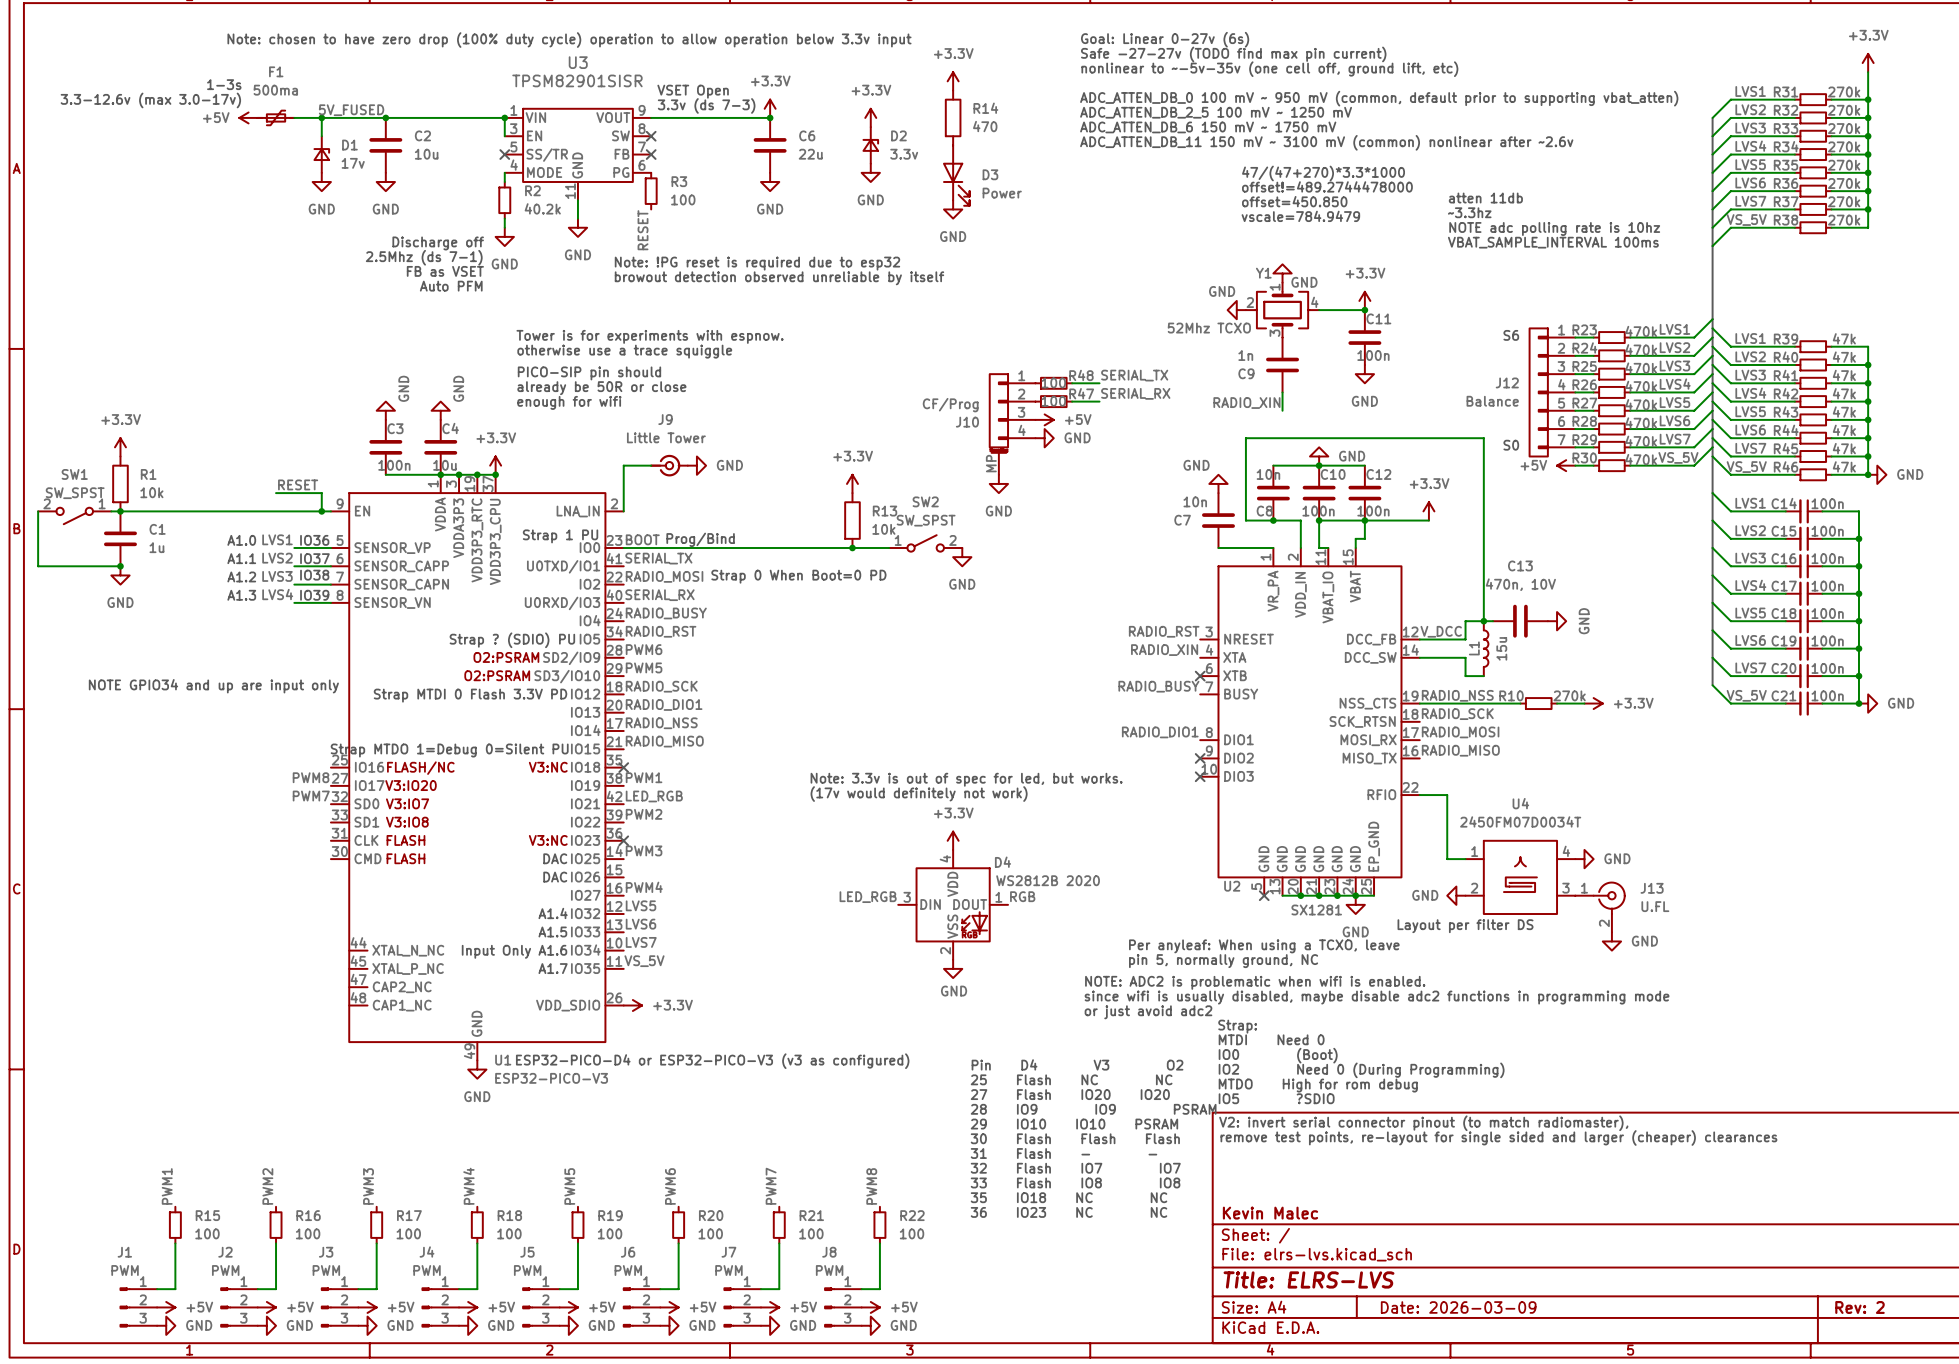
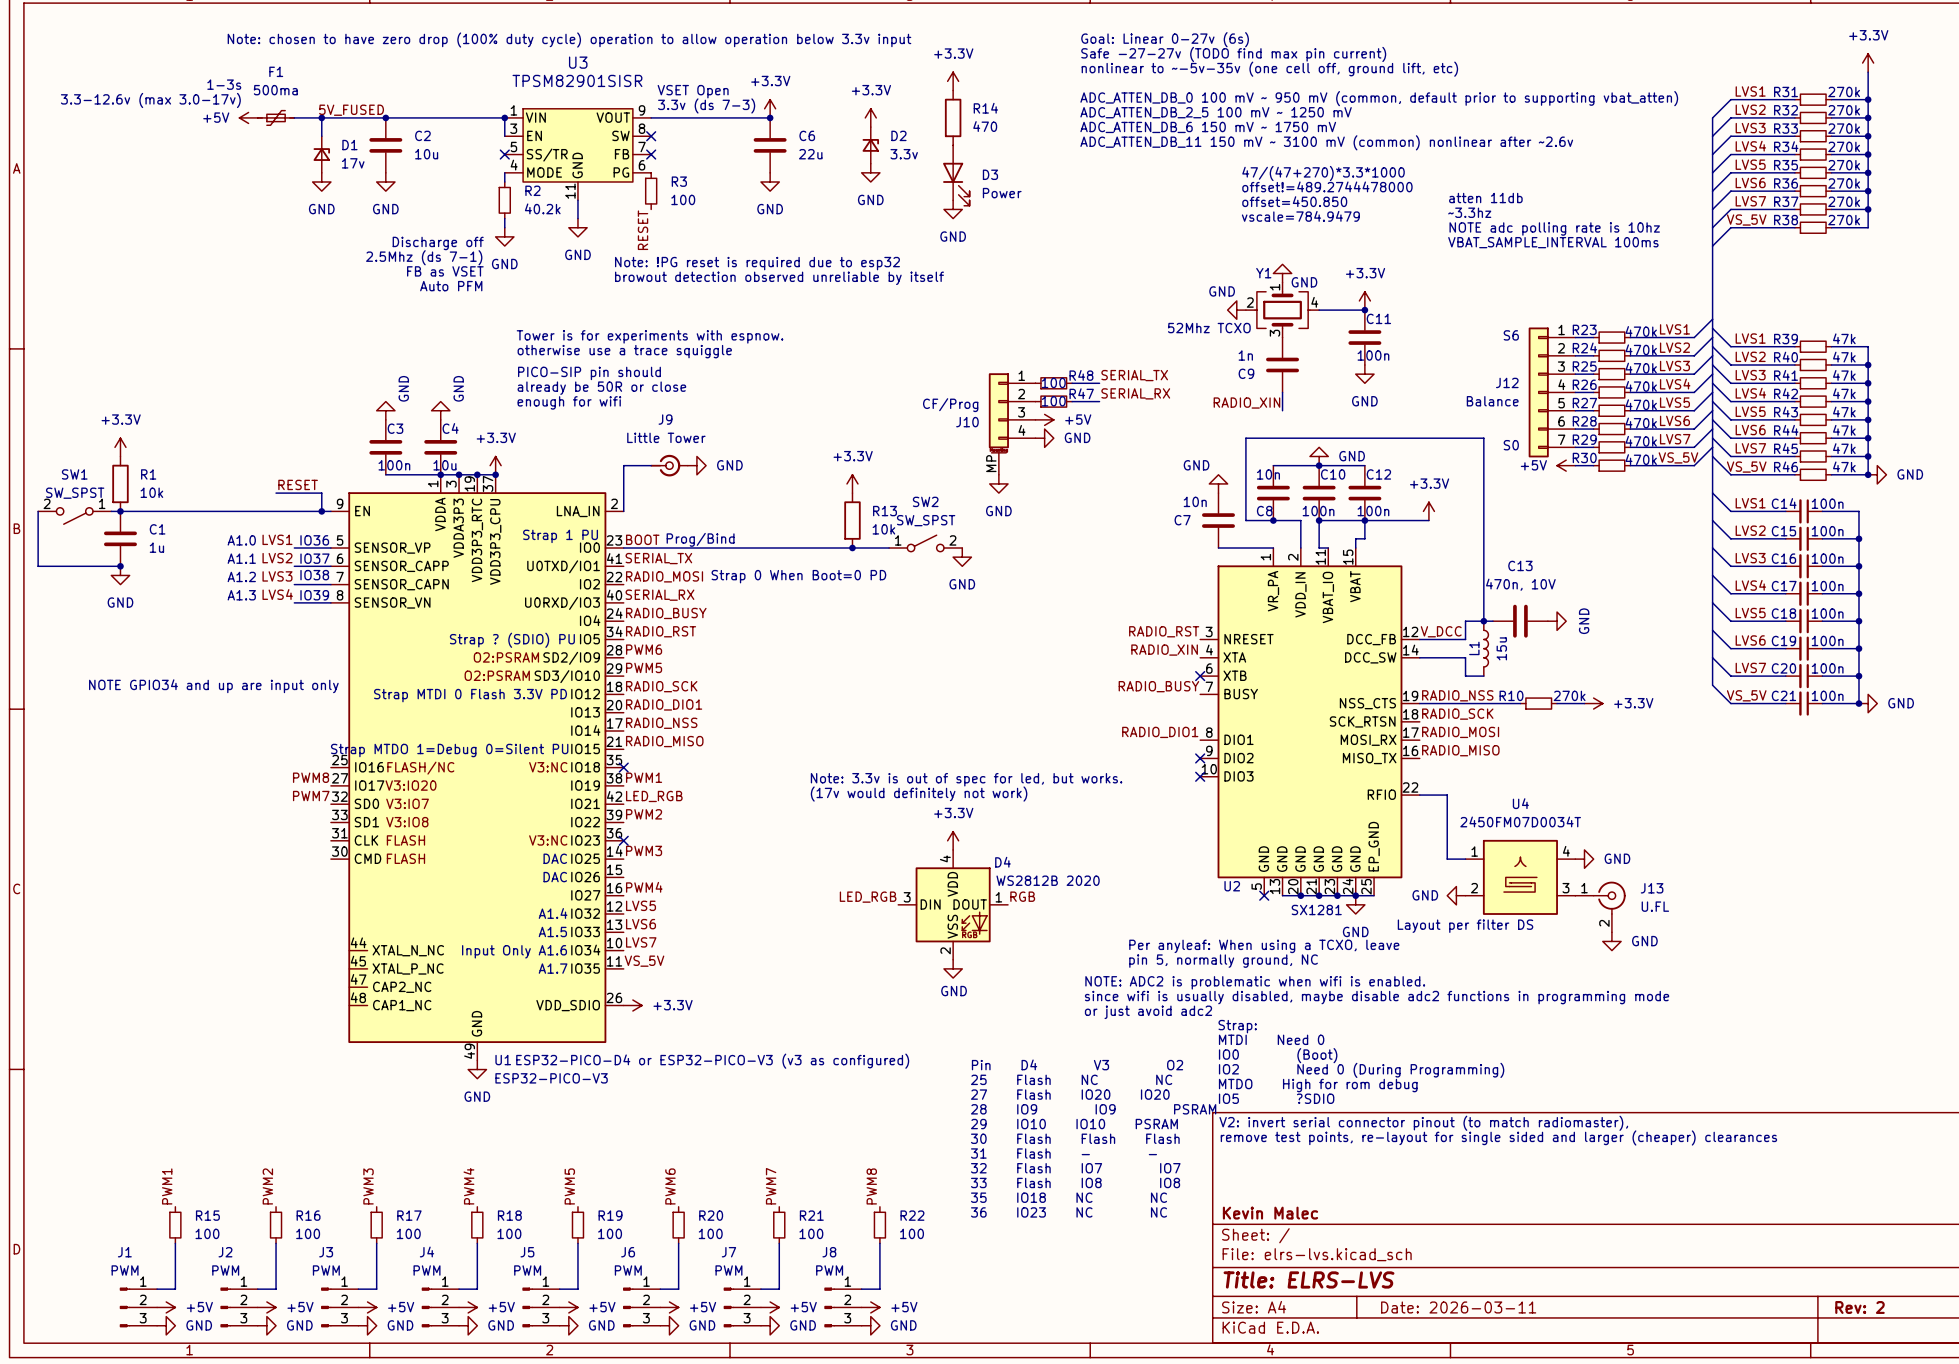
title block: Date: 2026-03-09 (1458, 1307) -> Date: 2026-03-11 (1458, 1307)

